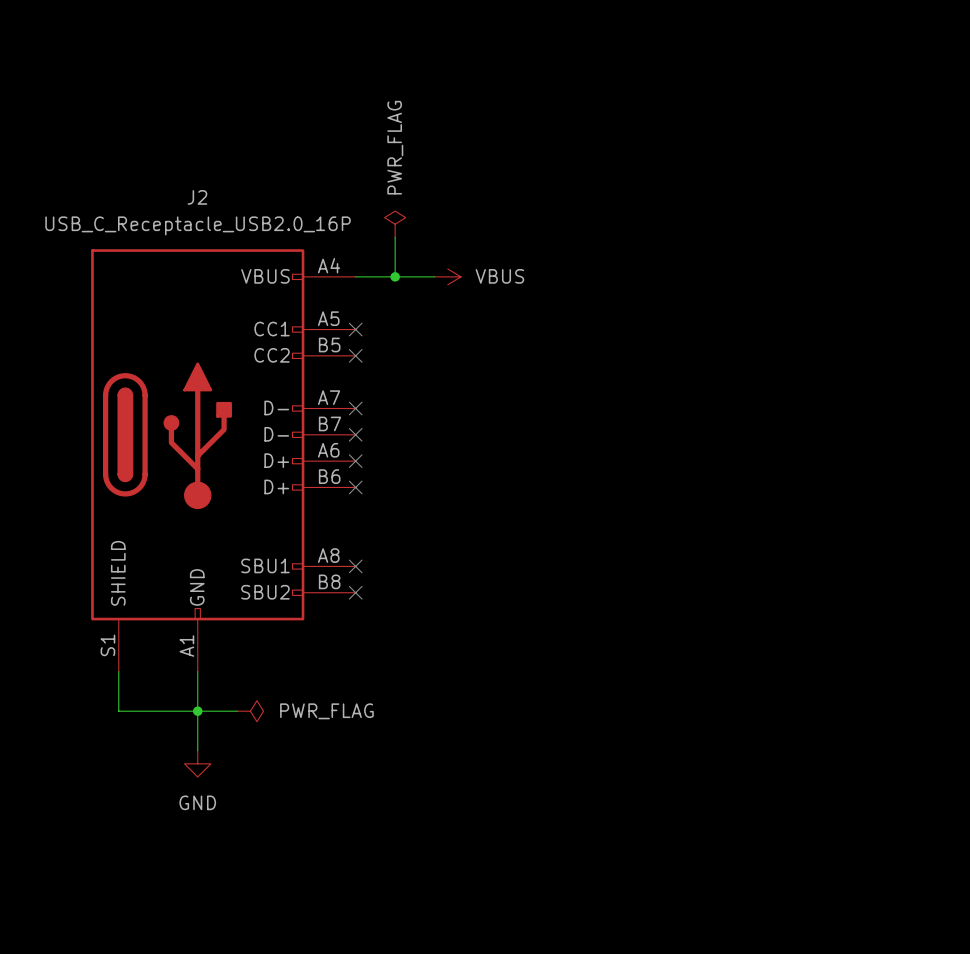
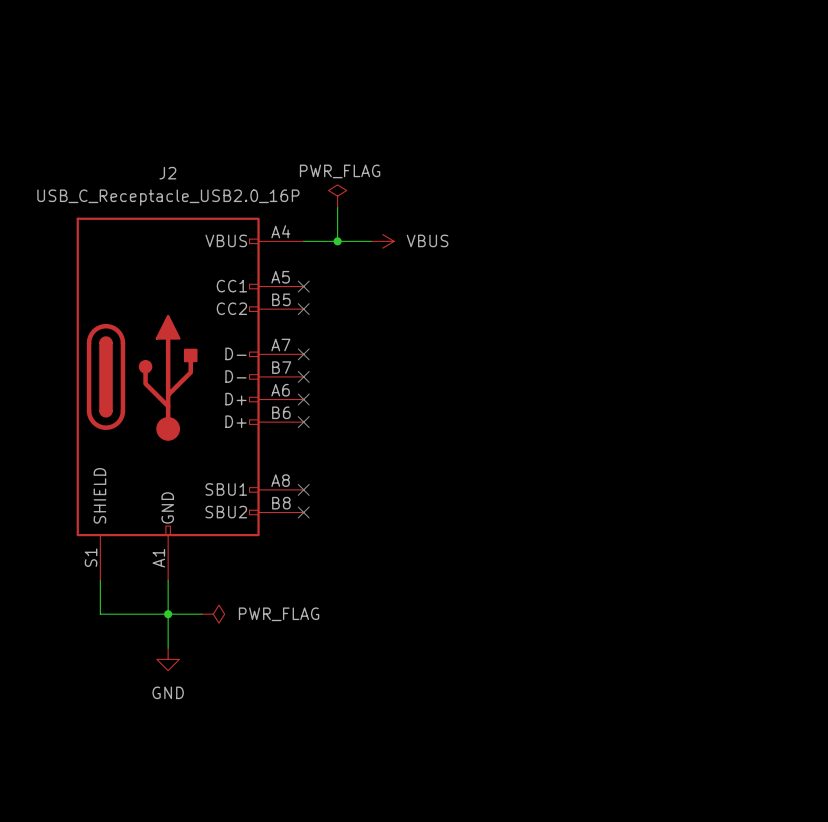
power symbol text rotation: 0° (395, 147) -> 90° clockwise (340, 171)

